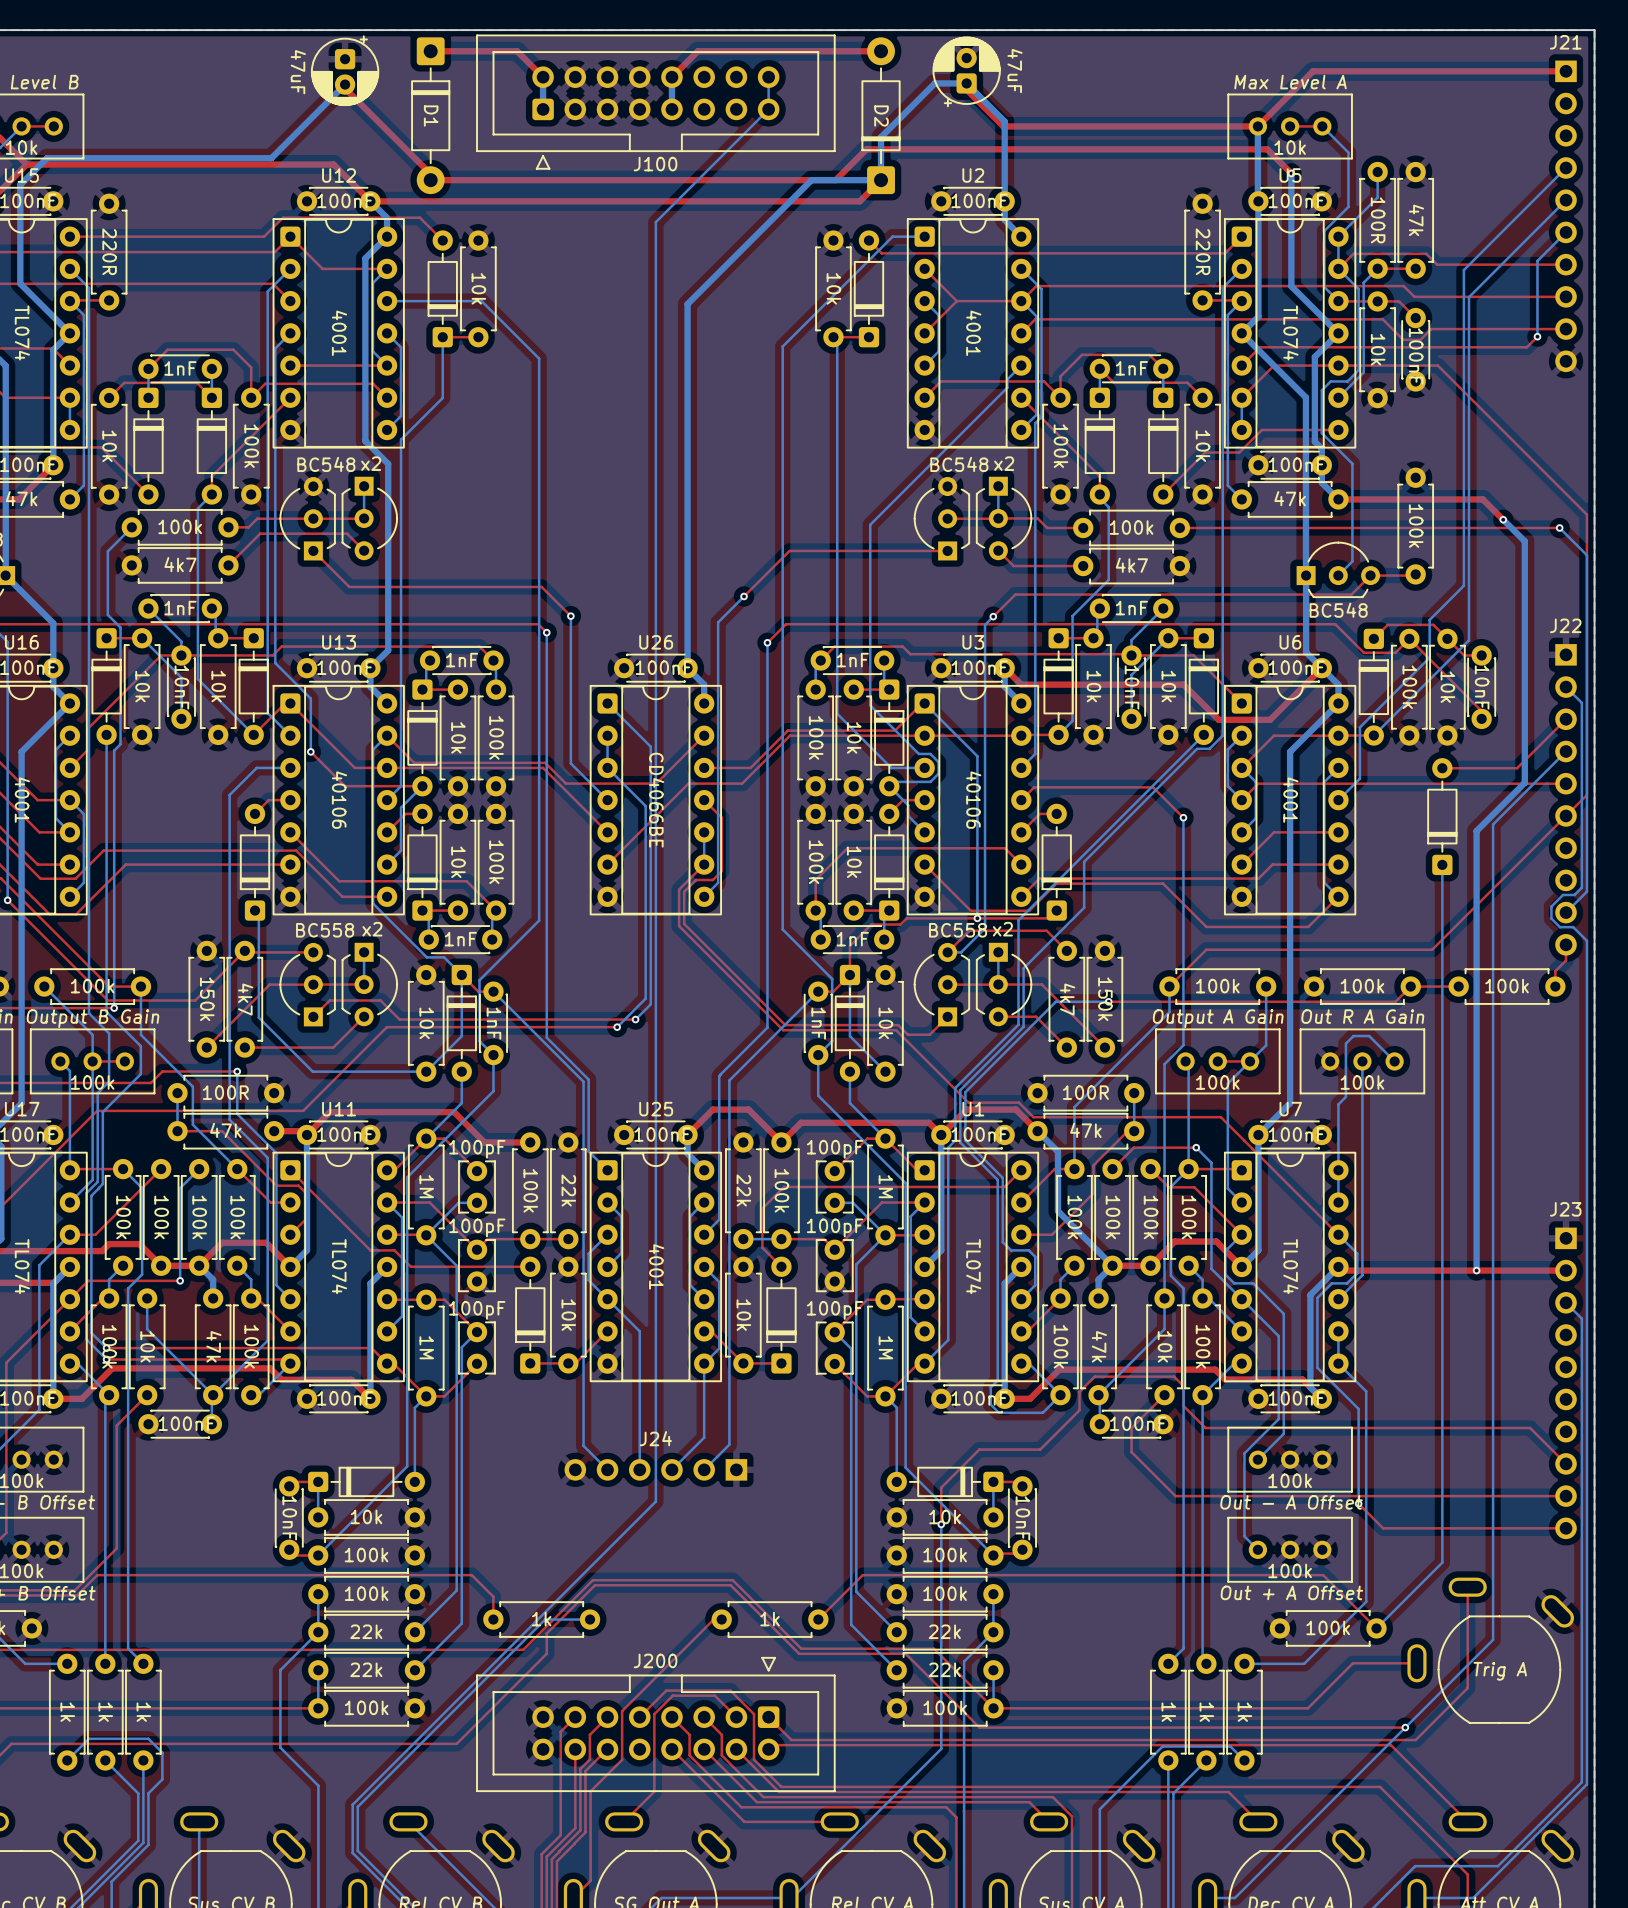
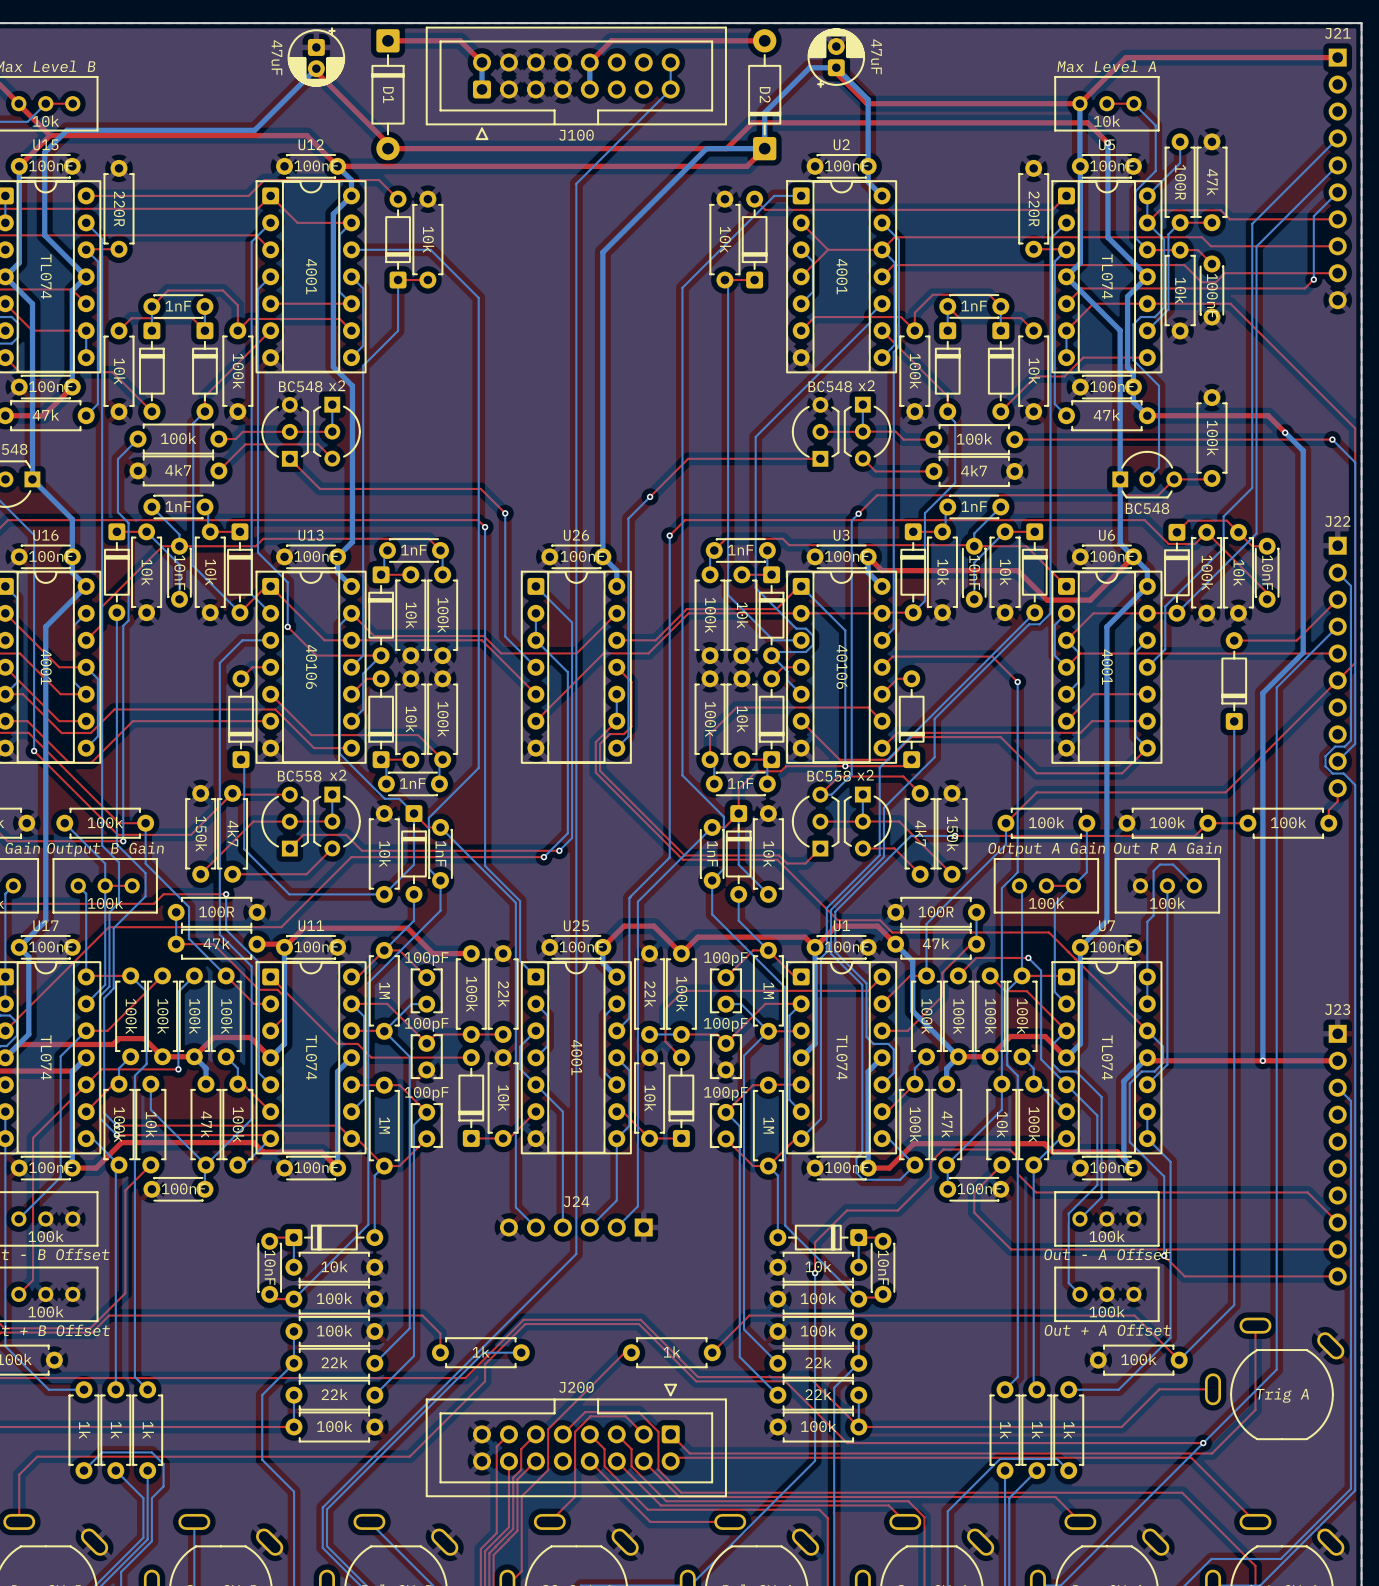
U26 value: CD4066BE (656, 800) -> none

